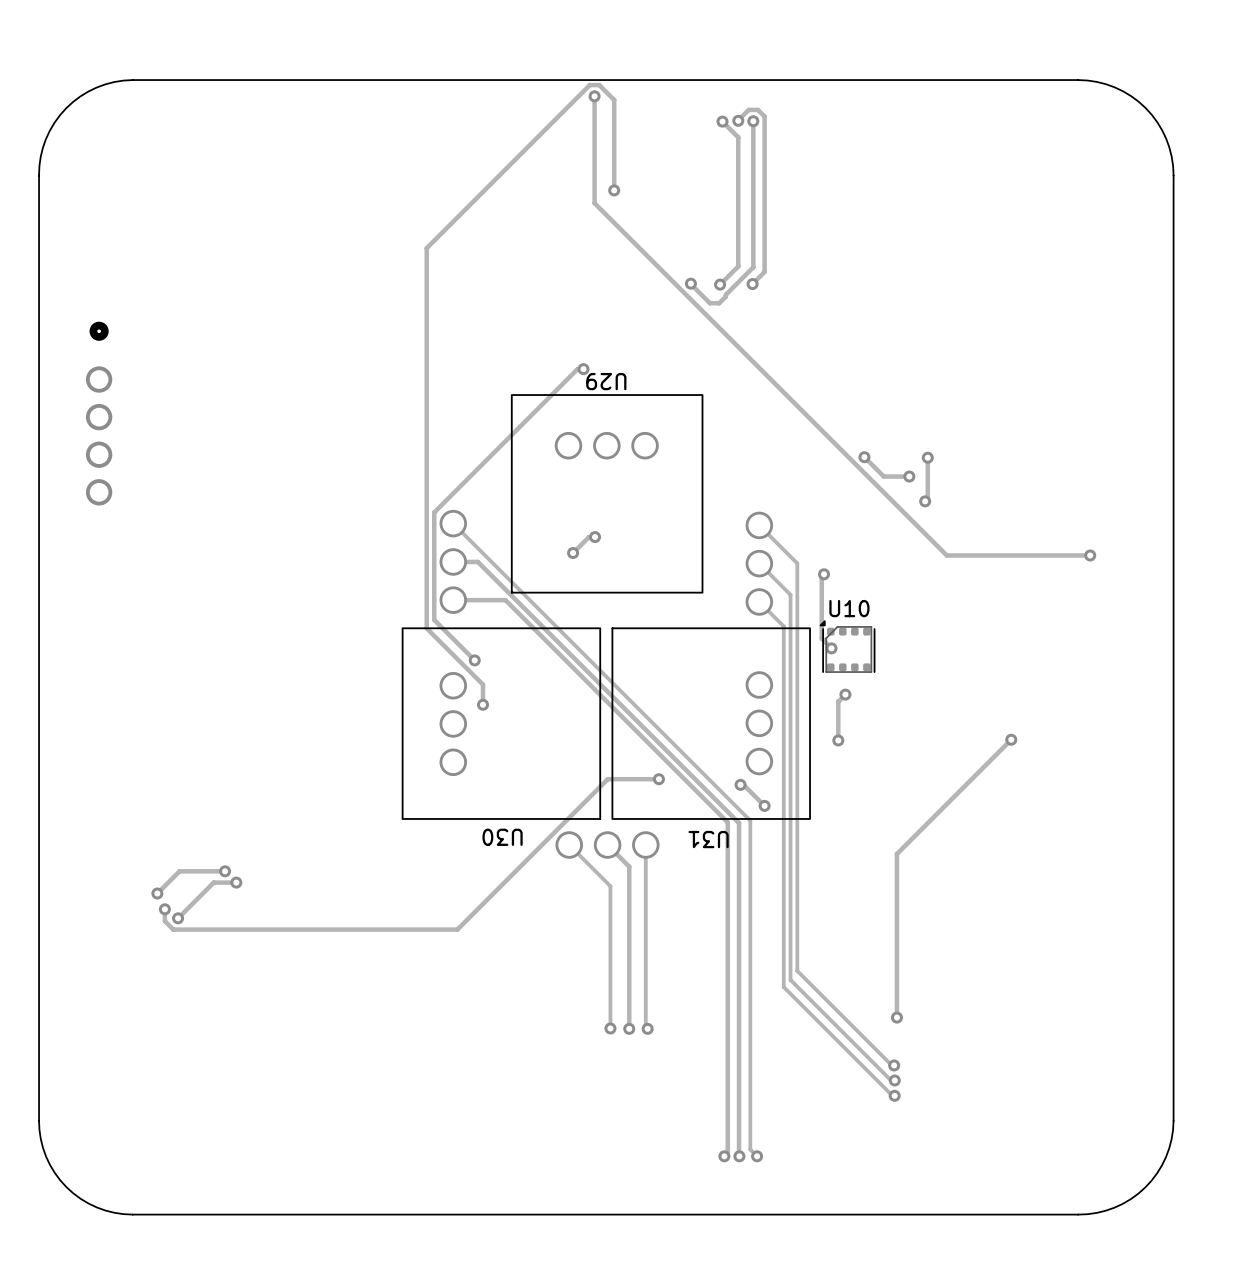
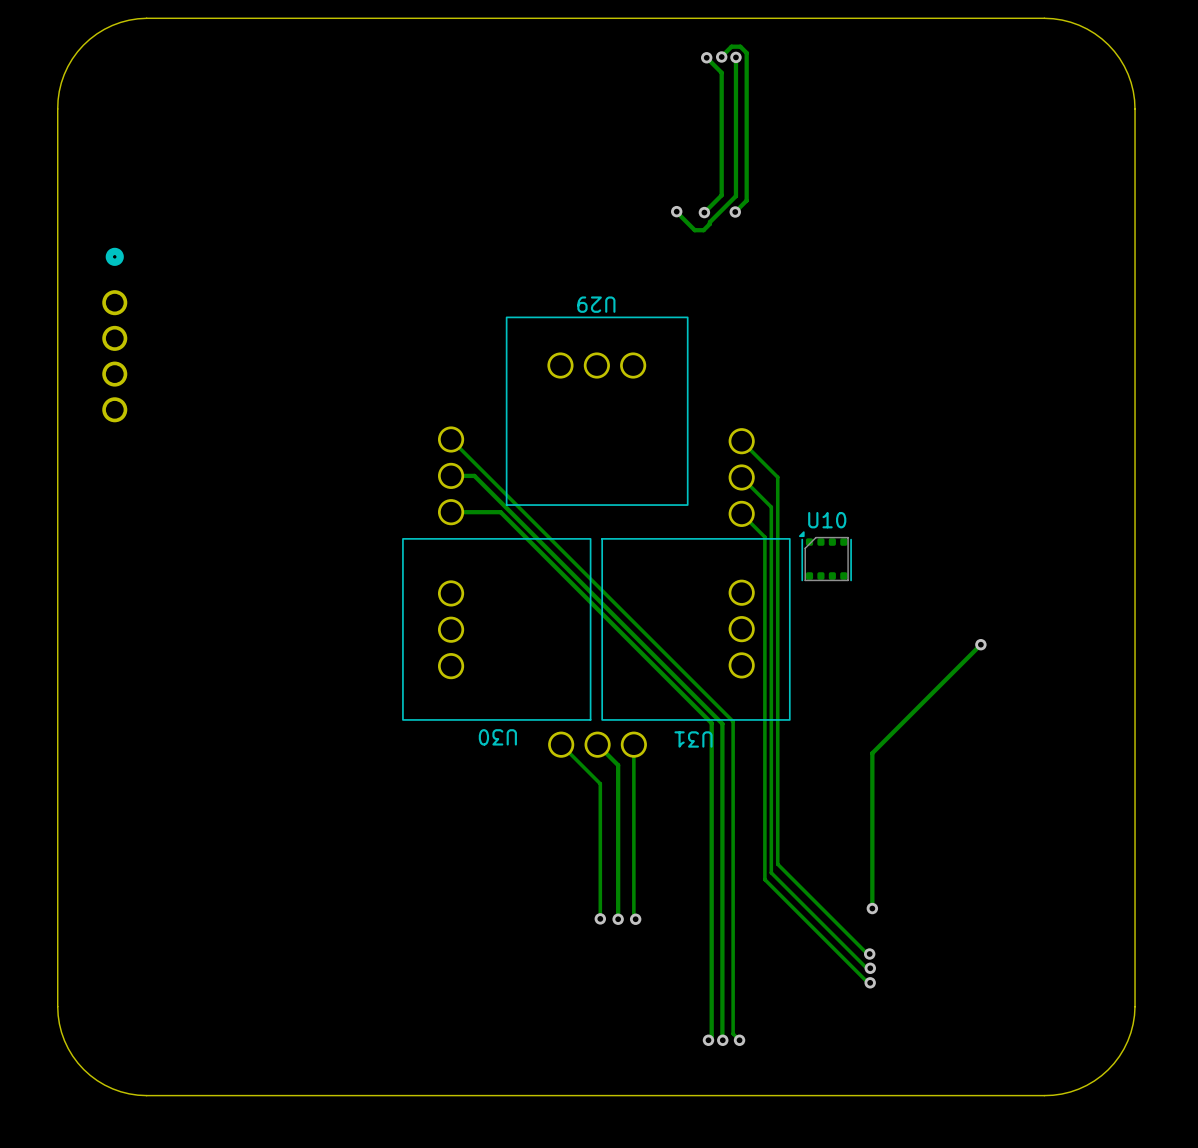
track: (594, 96) (594, 203) (946, 555) (1090, 555) -> none
via: (594, 96) -> none
track: (614, 190) (614, 100) (599, 85) (589, 85) (426, 248) (426, 628) (482, 684) (482, 704) -> none
via: (614, 190) -> none
track: (583, 369) (577, 369) (434, 512) (434, 619) (474, 660) -> none
via: (583, 369) -> none
track: (864, 457) (883, 476) (909, 476) -> none
via: (864, 457) -> none
track: (927, 457) (927, 498) (925, 501) -> none
via: (927, 457) -> none
via: (909, 476) -> none
via: (925, 501) -> none
track: (595, 537) (589, 537) (573, 553) -> none
via: (595, 537) -> none
via: (573, 553) -> none
via: (1090, 555) -> none
track: (824, 574) (821, 576) (821, 638) (831, 648) -> none
via: (824, 574) -> none
via: (831, 648) -> none
via: (474, 660) -> none
track: (845, 694) (838, 701) (838, 740) -> none
via: (845, 694) -> none
via: (482, 704) -> none
via: (838, 740) -> none
track: (658, 779) (607, 779) (457, 929) (173, 929) (164, 921) (164, 909) -> none
via: (658, 779) -> none
track: (740, 784) (743, 784) (764, 805) -> none
via: (740, 784) -> none
via: (764, 805) -> none
track: (225, 871) (179, 871) (157, 893) -> none
via: (225, 871) -> none
track: (236, 882) (213, 882) (178, 918) -> none
via: (236, 882) -> none
via: (157, 893) -> none
via: (164, 909) -> none
via: (178, 918) -> none

